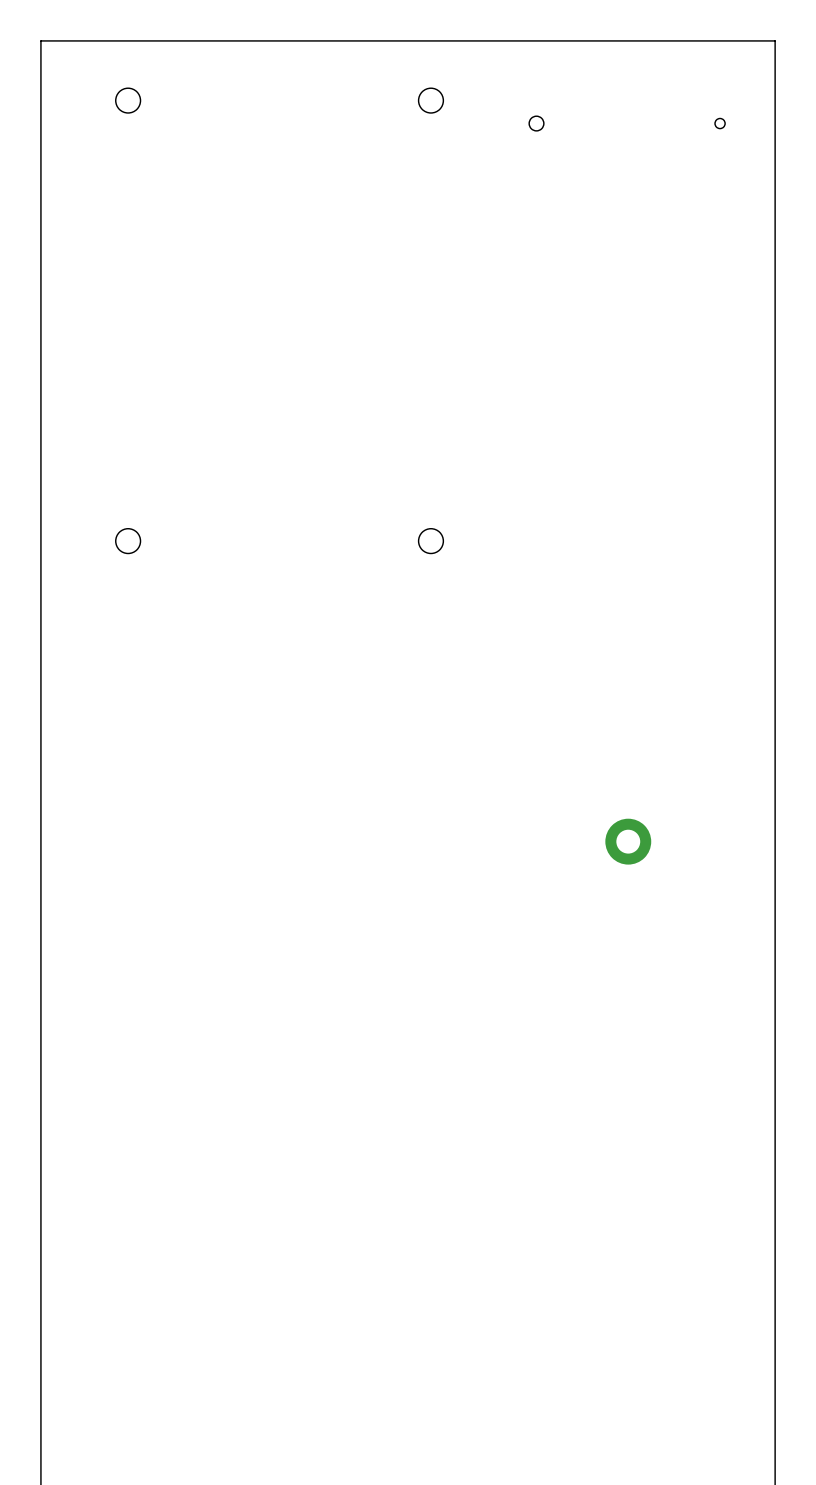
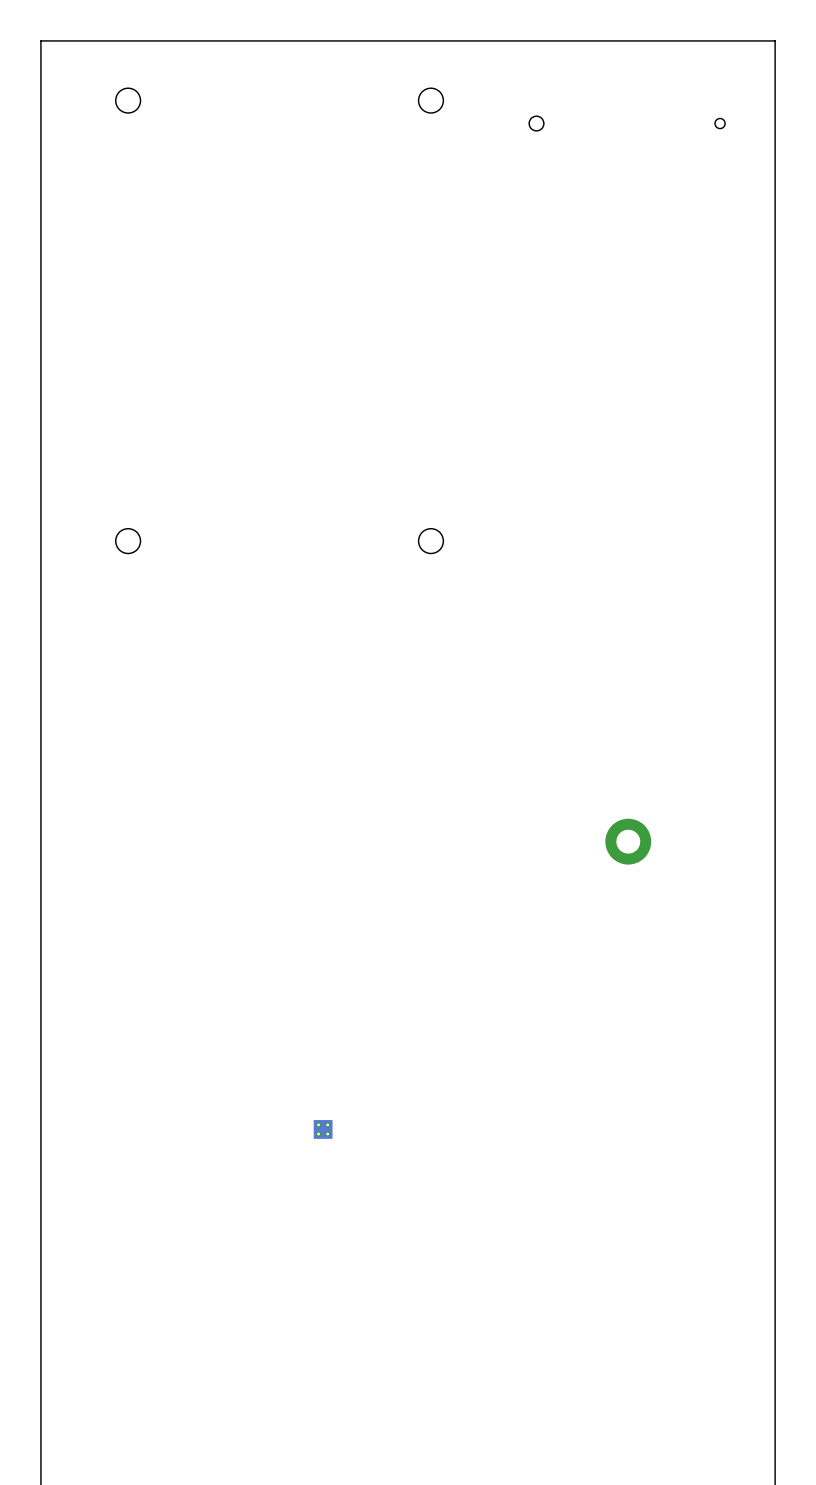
part: none -> (323, 1129)

